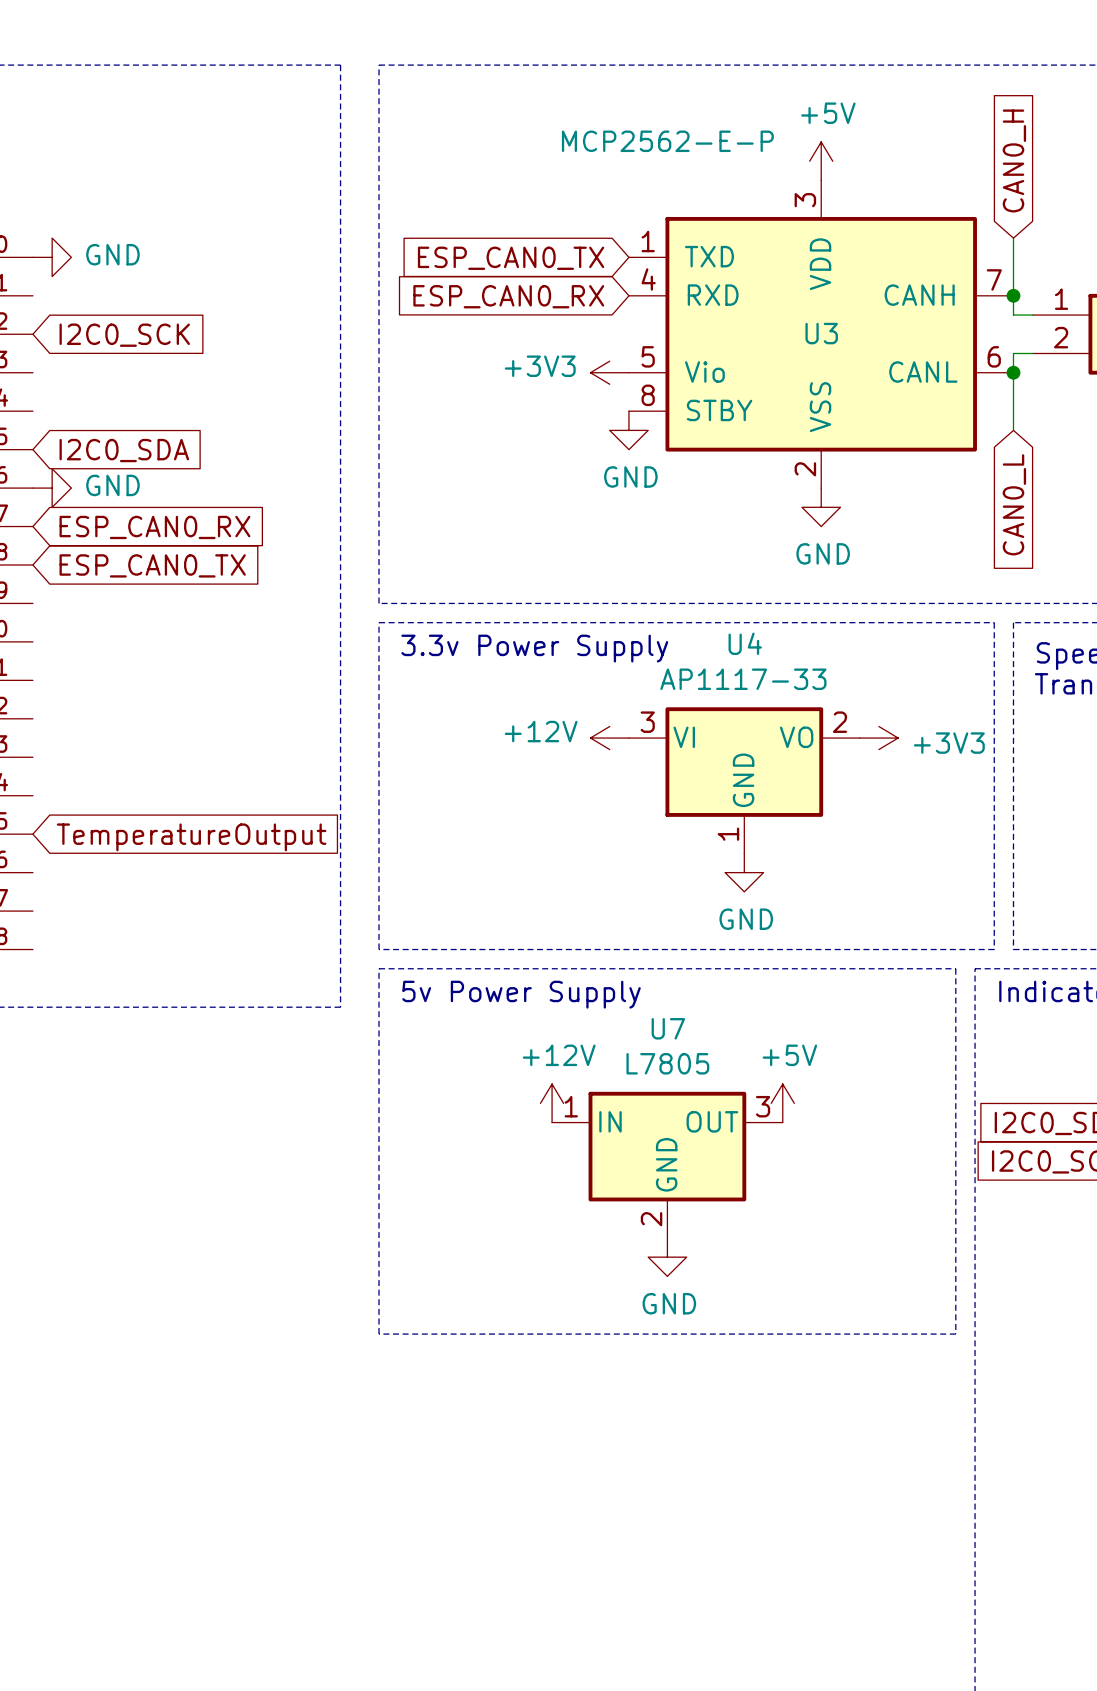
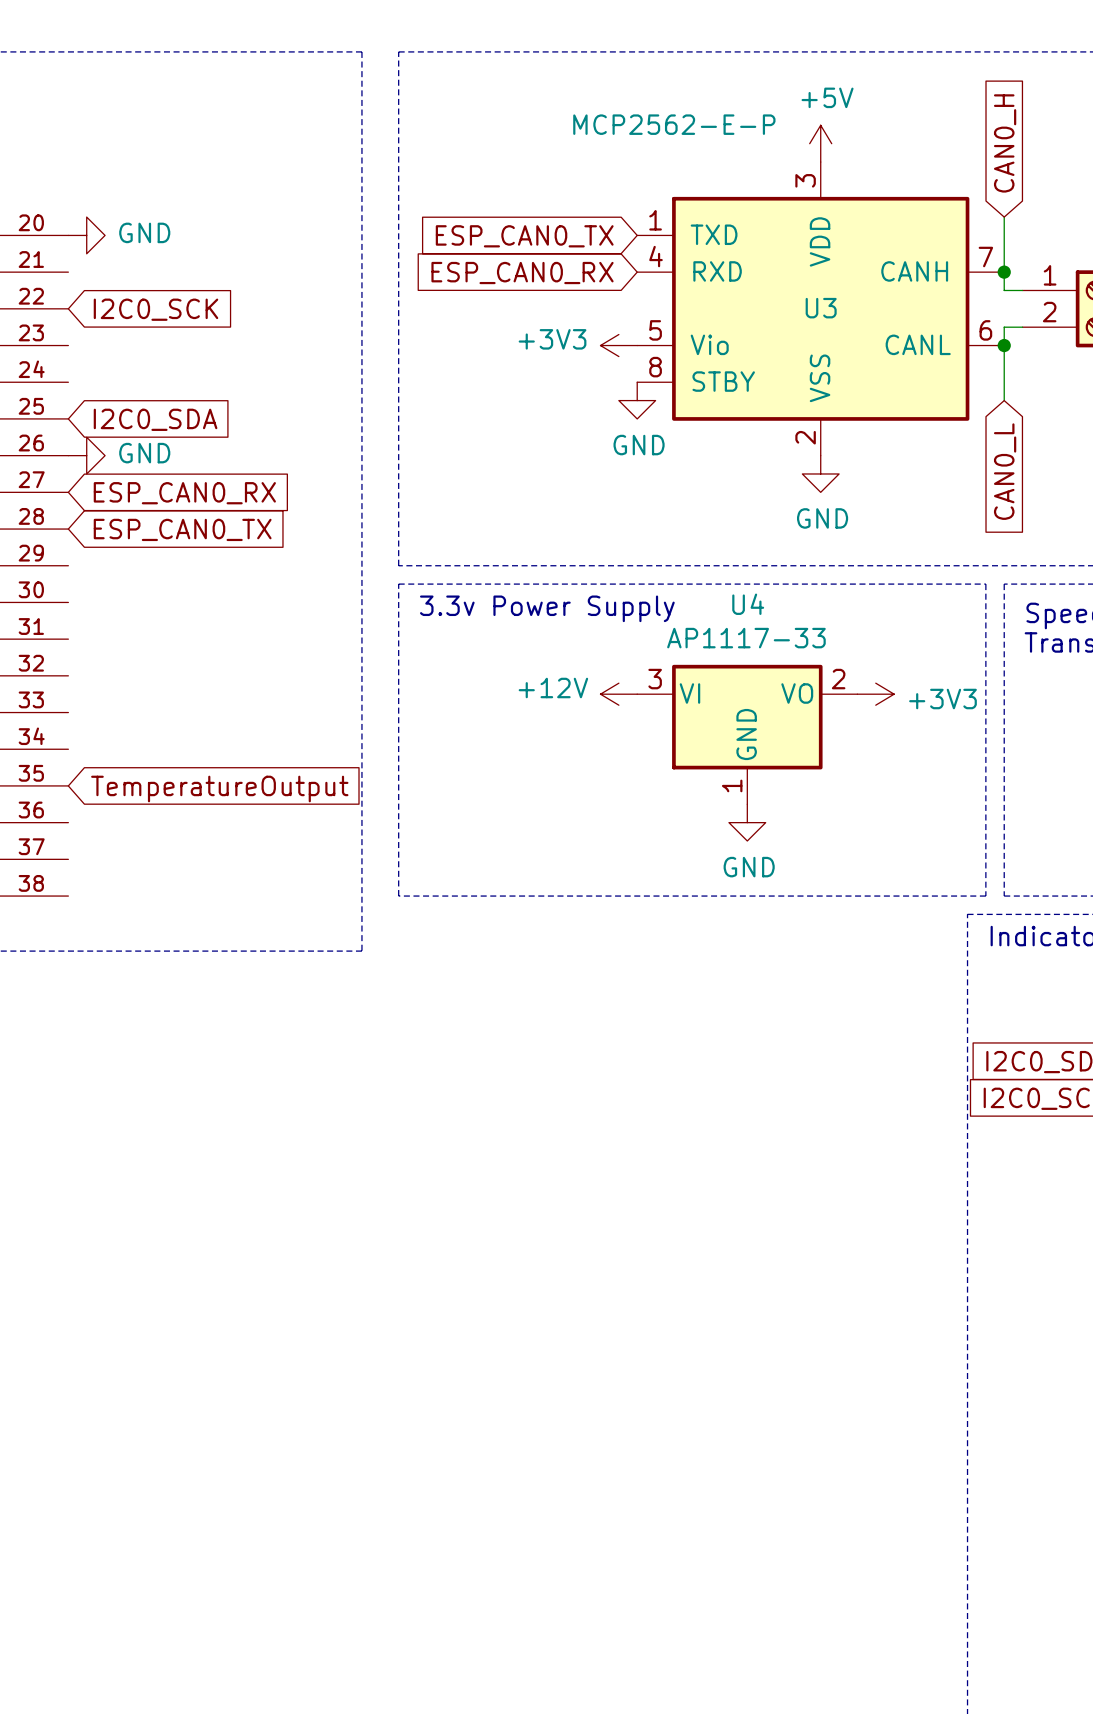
line: (379, 968) (955, 968) (955, 1334) (379, 1334) (379, 968) -> none
text: 5v Power Supply (521, 994) -> none
power symbol: +12V (552, 1103) -> none
power symbol: +5V (782, 1103) -> none
U7: L7805 (667, 1164) -> none
power symbol: GND (667, 1257) -> none

